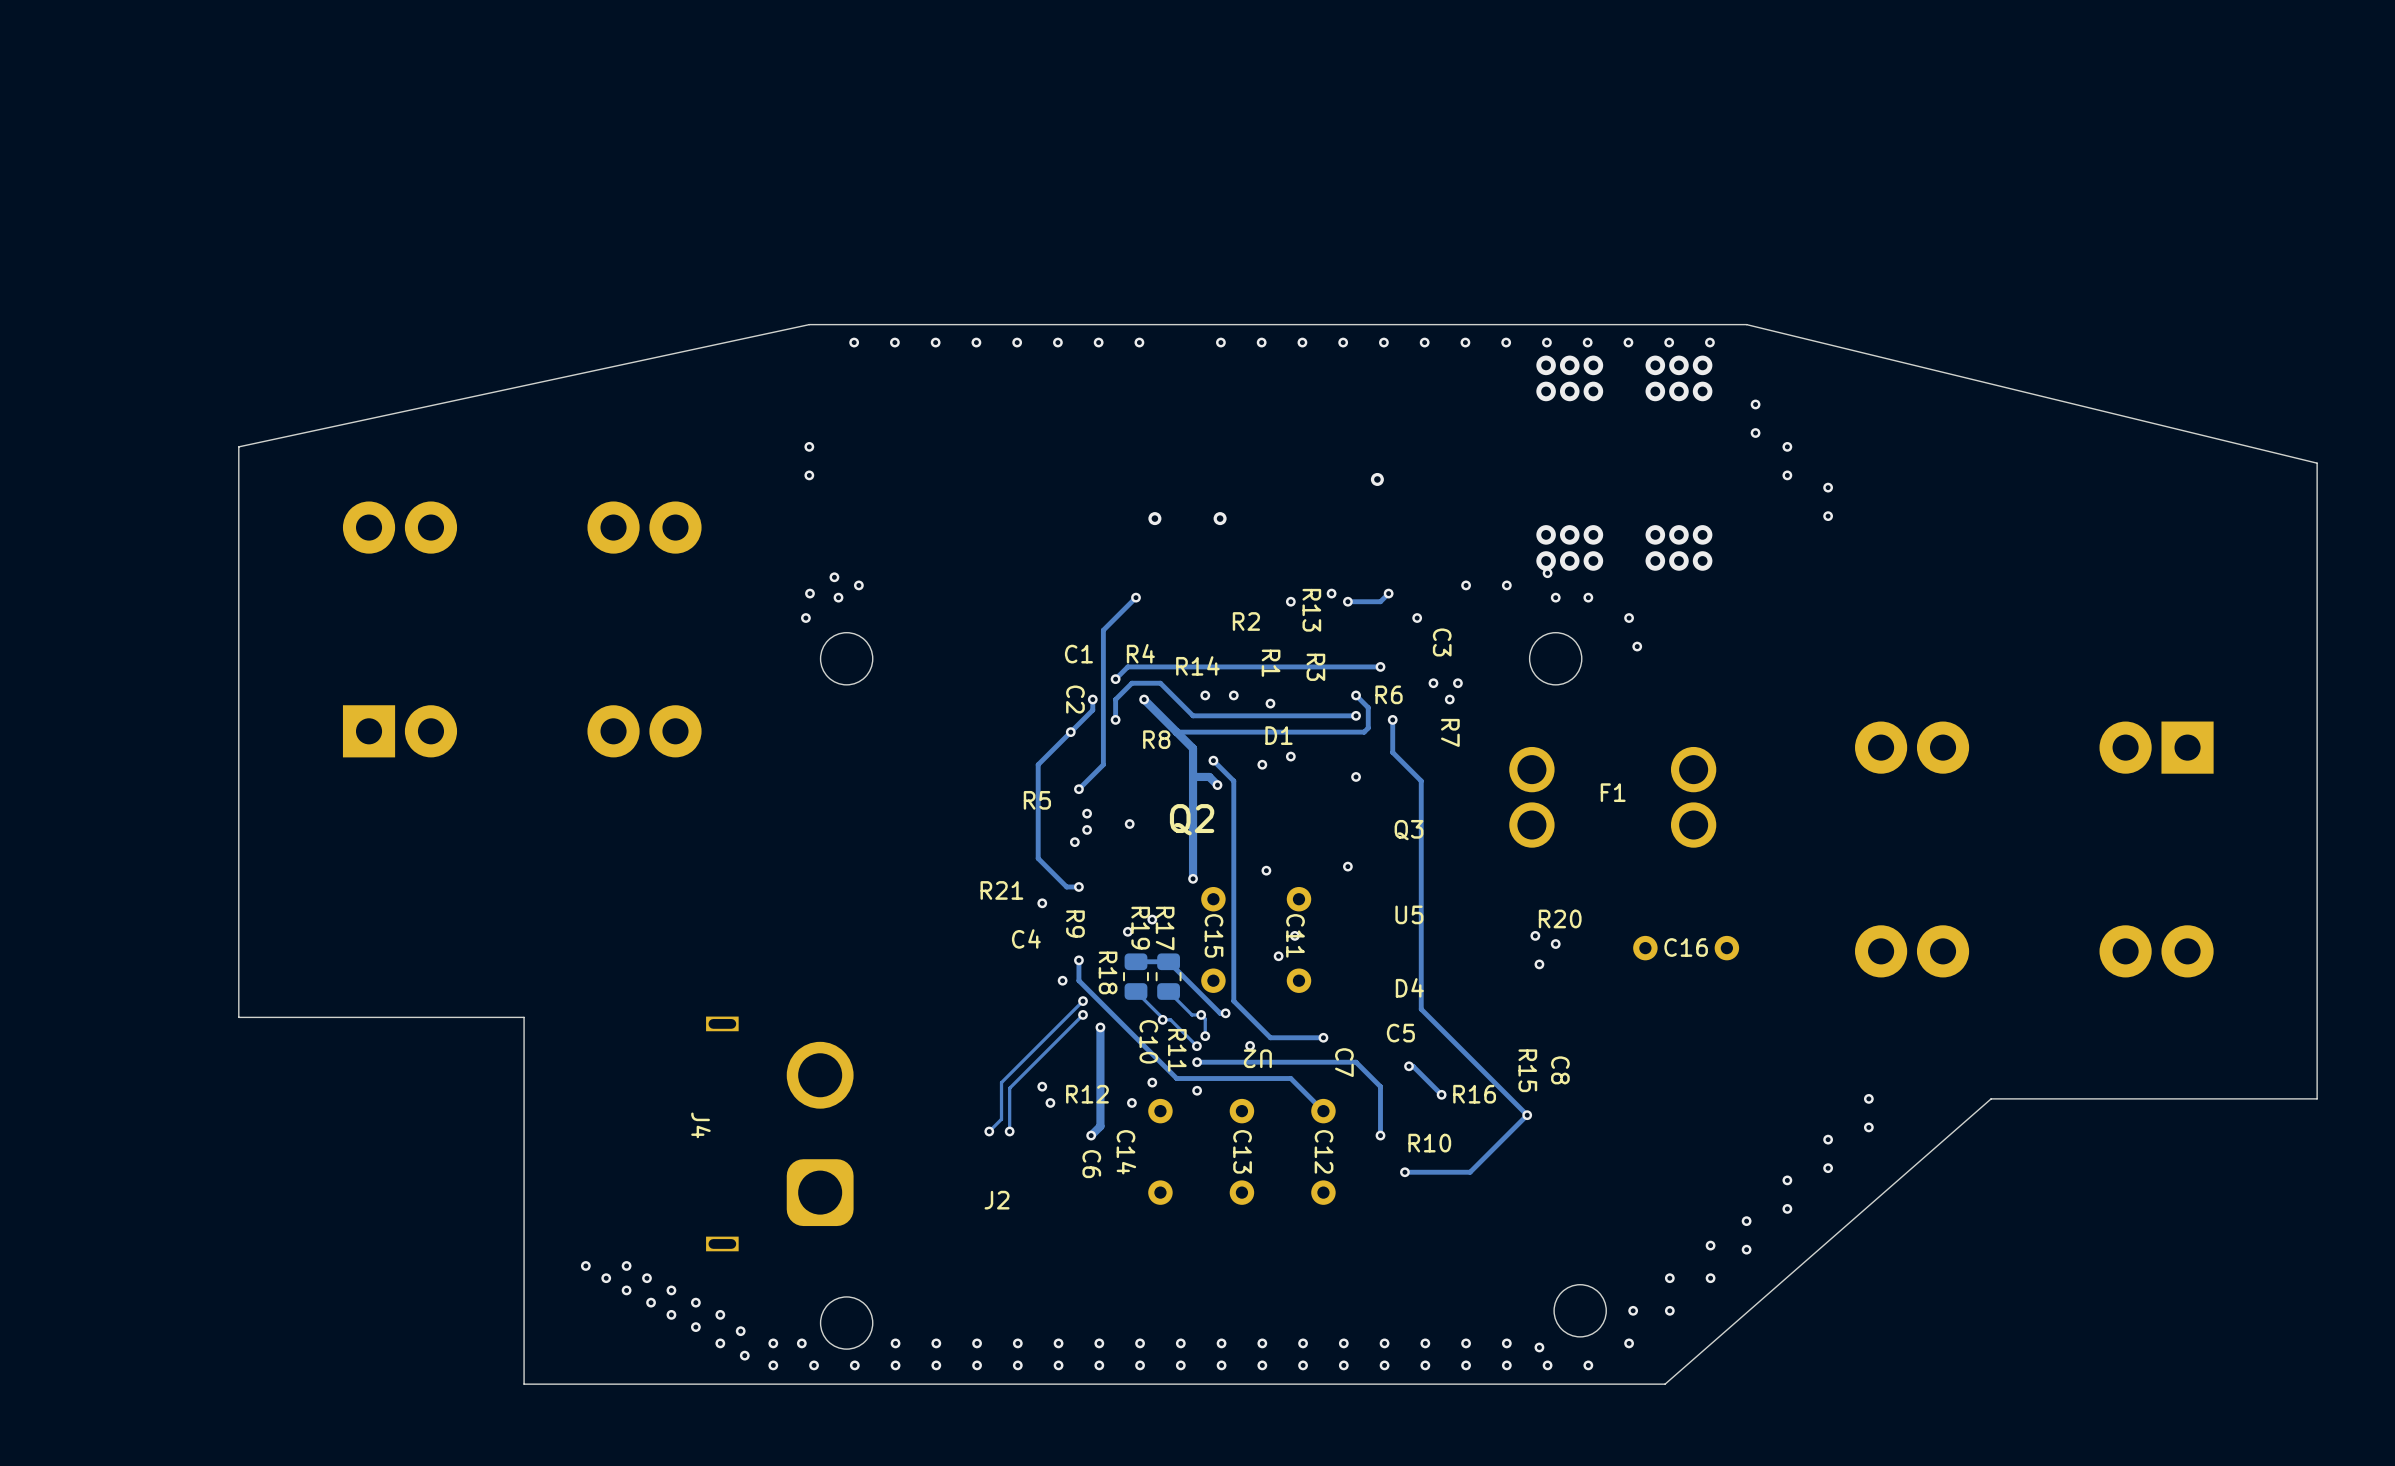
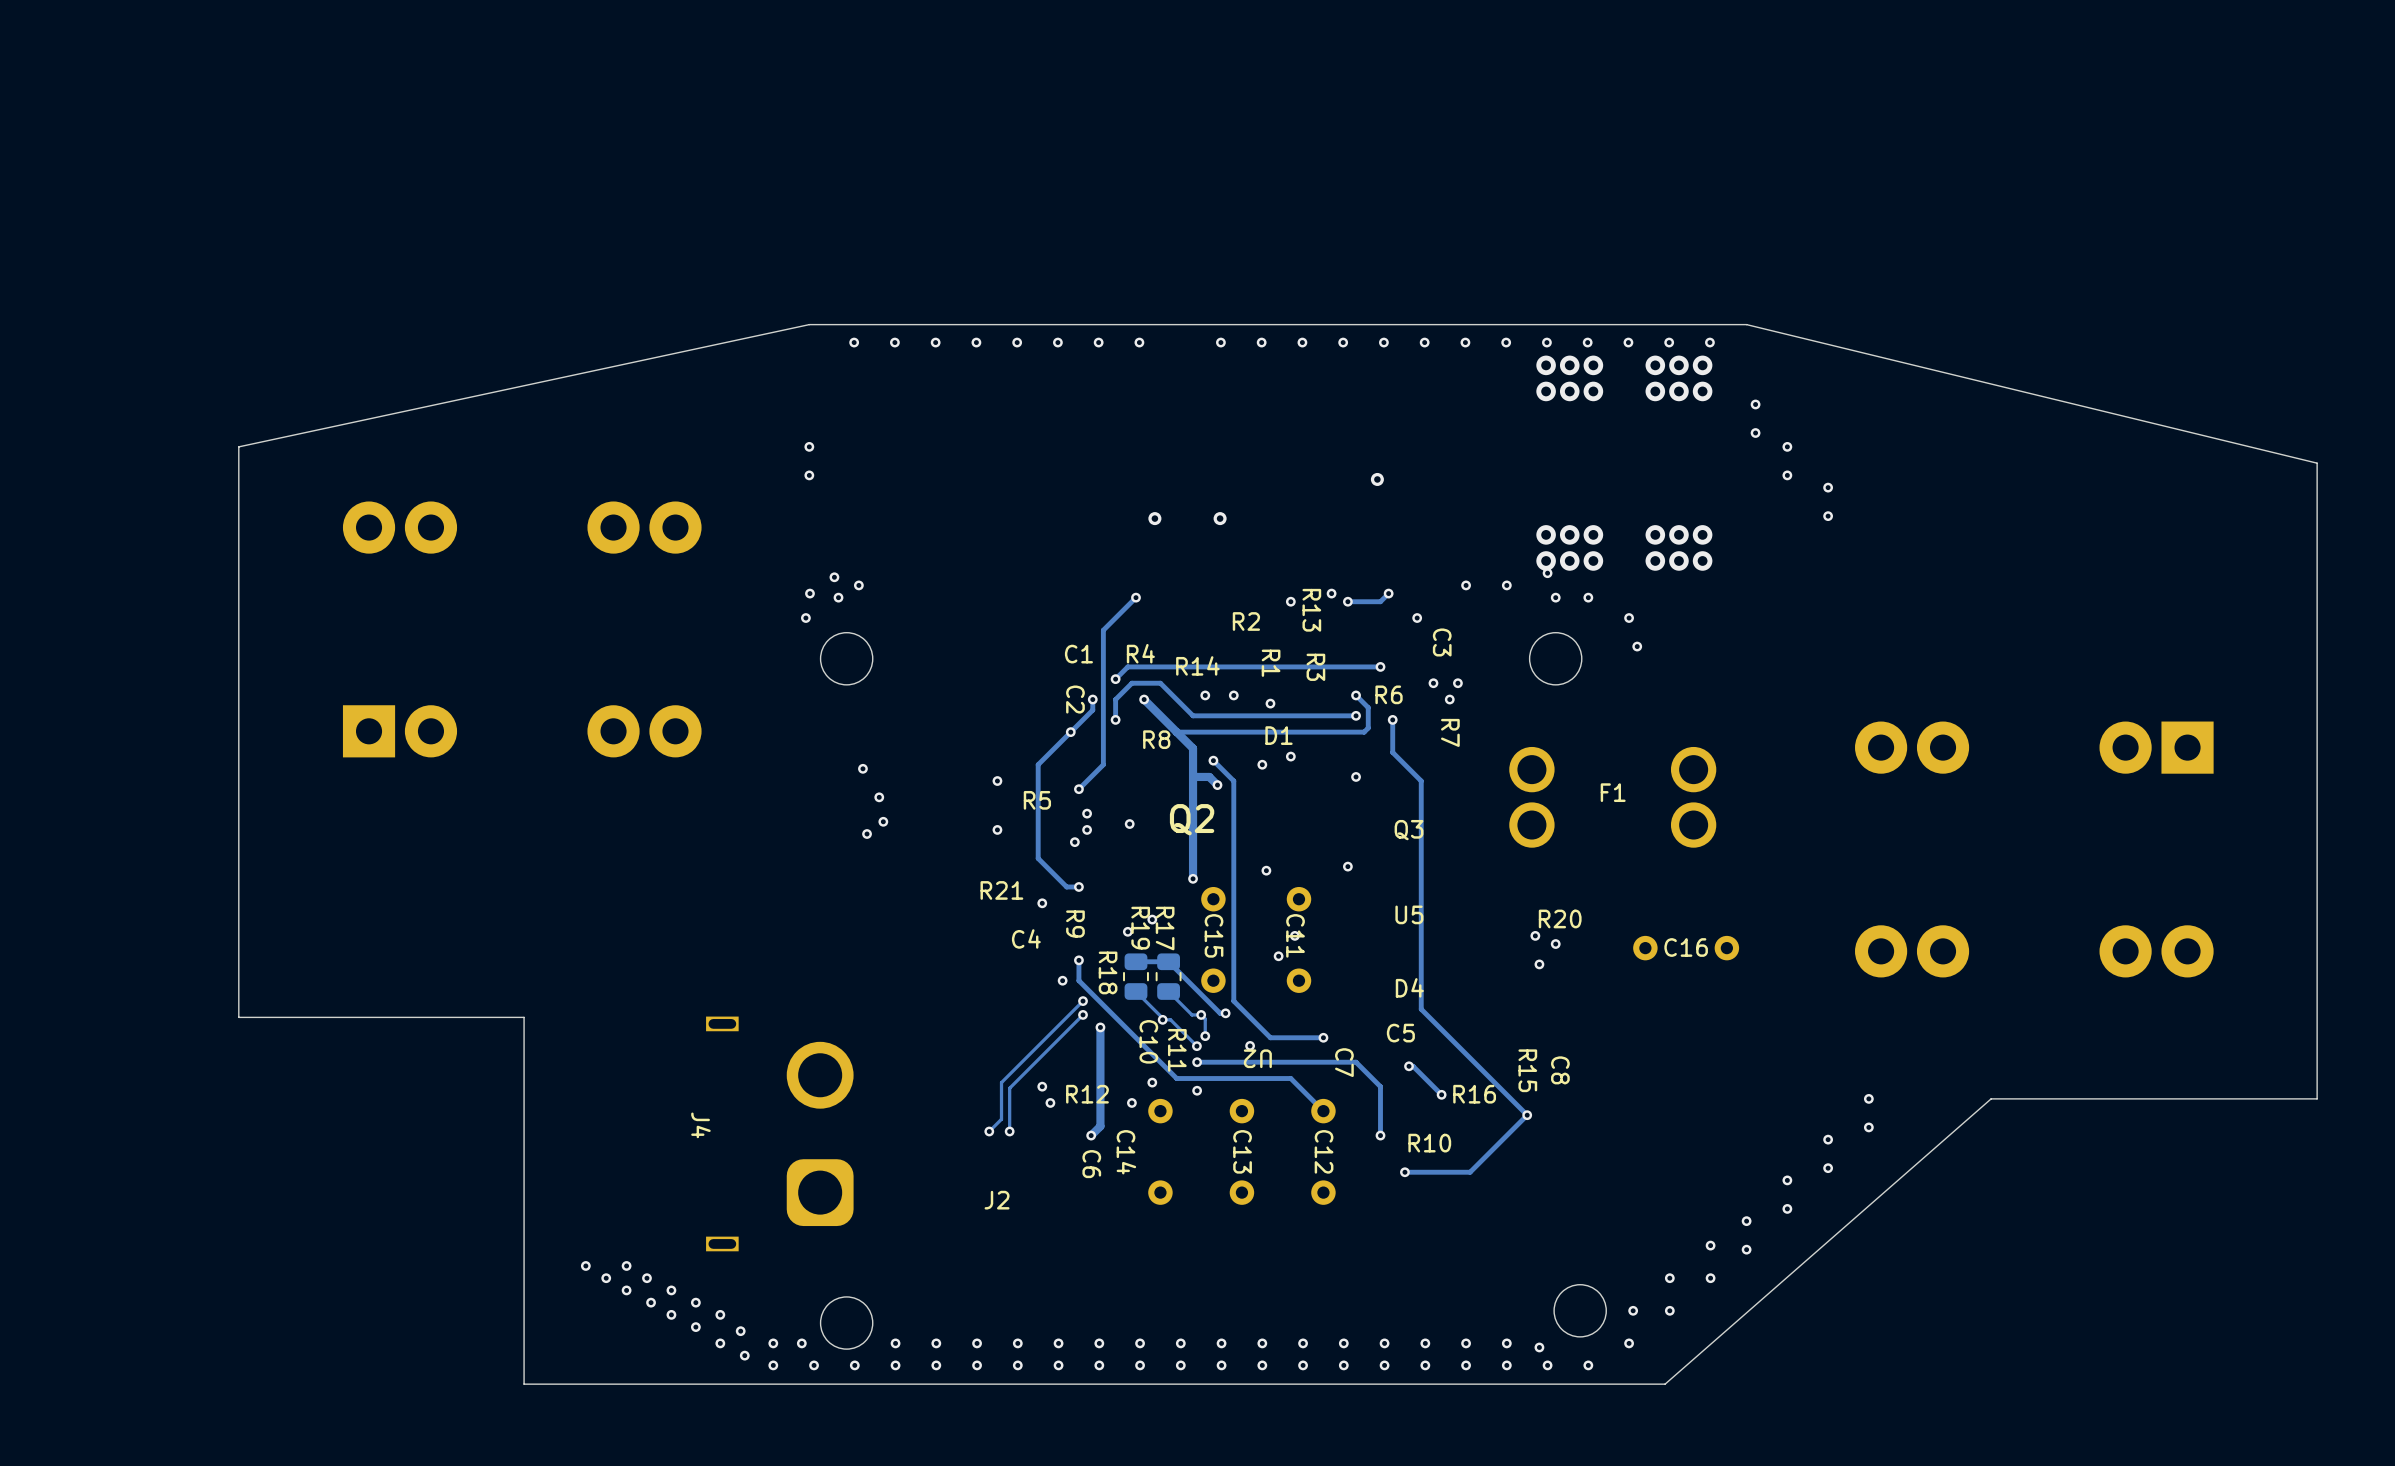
via: none -> (862, 768)
via: none -> (997, 781)
via: none -> (879, 797)
via: none -> (883, 821)
via: none -> (997, 829)
via: none -> (867, 834)

